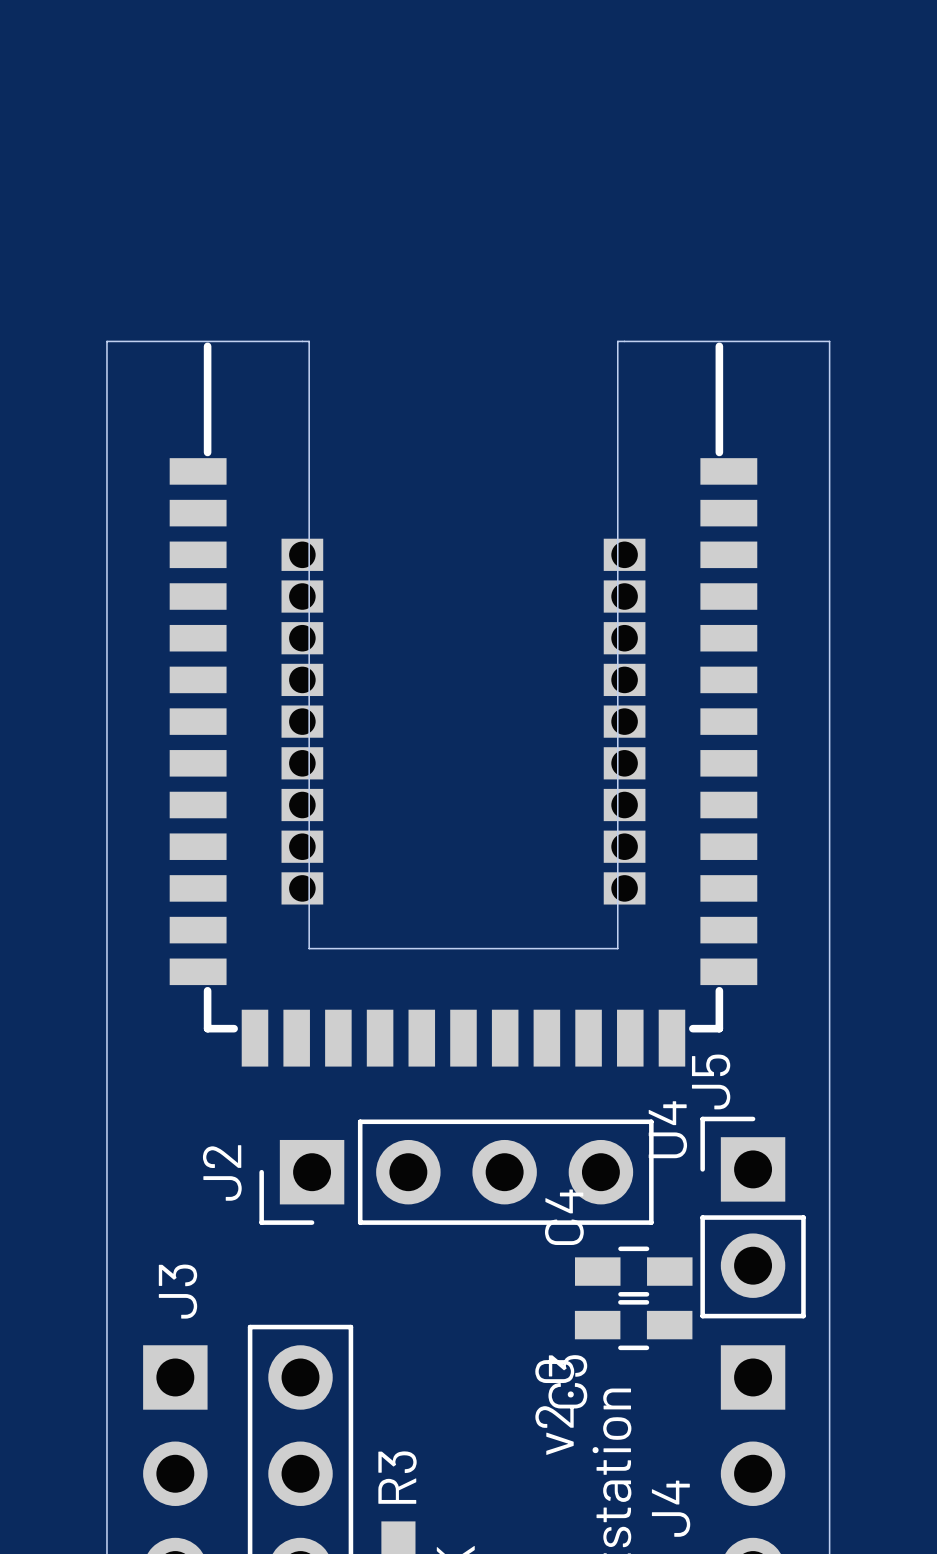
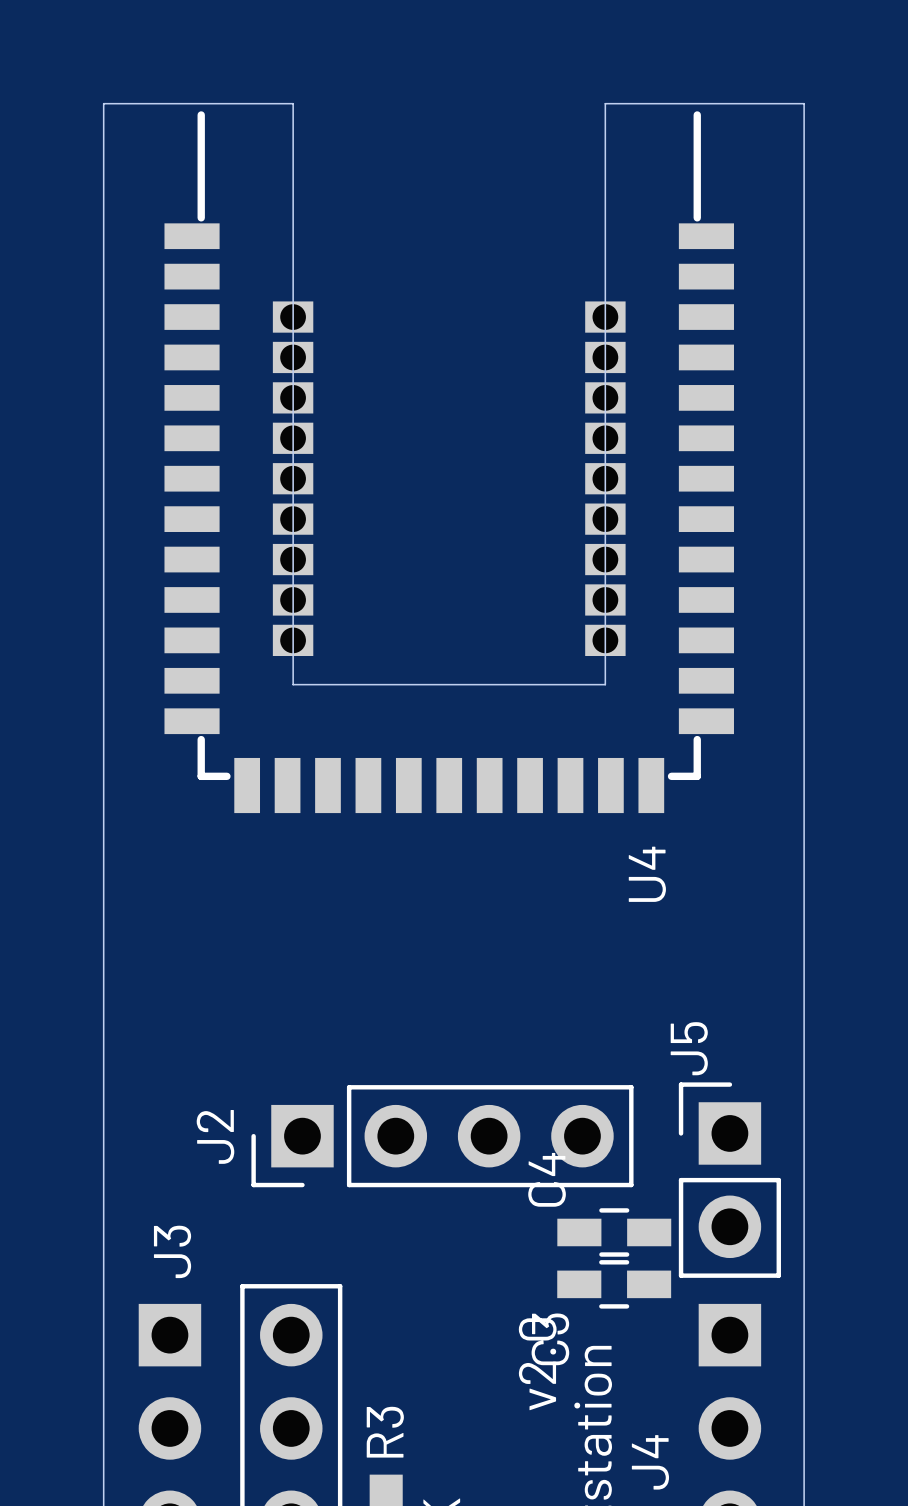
board edge: (106, 341) (309, 341) (309, 948) (617, 948) (617, 341) (829, 341) -> (103, 330) (103, 103) (293, 103) (293, 684) (605, 684) (605, 103) (804, 103) (804, 330)
U4 position: (463, 704) -> (449, 462)

